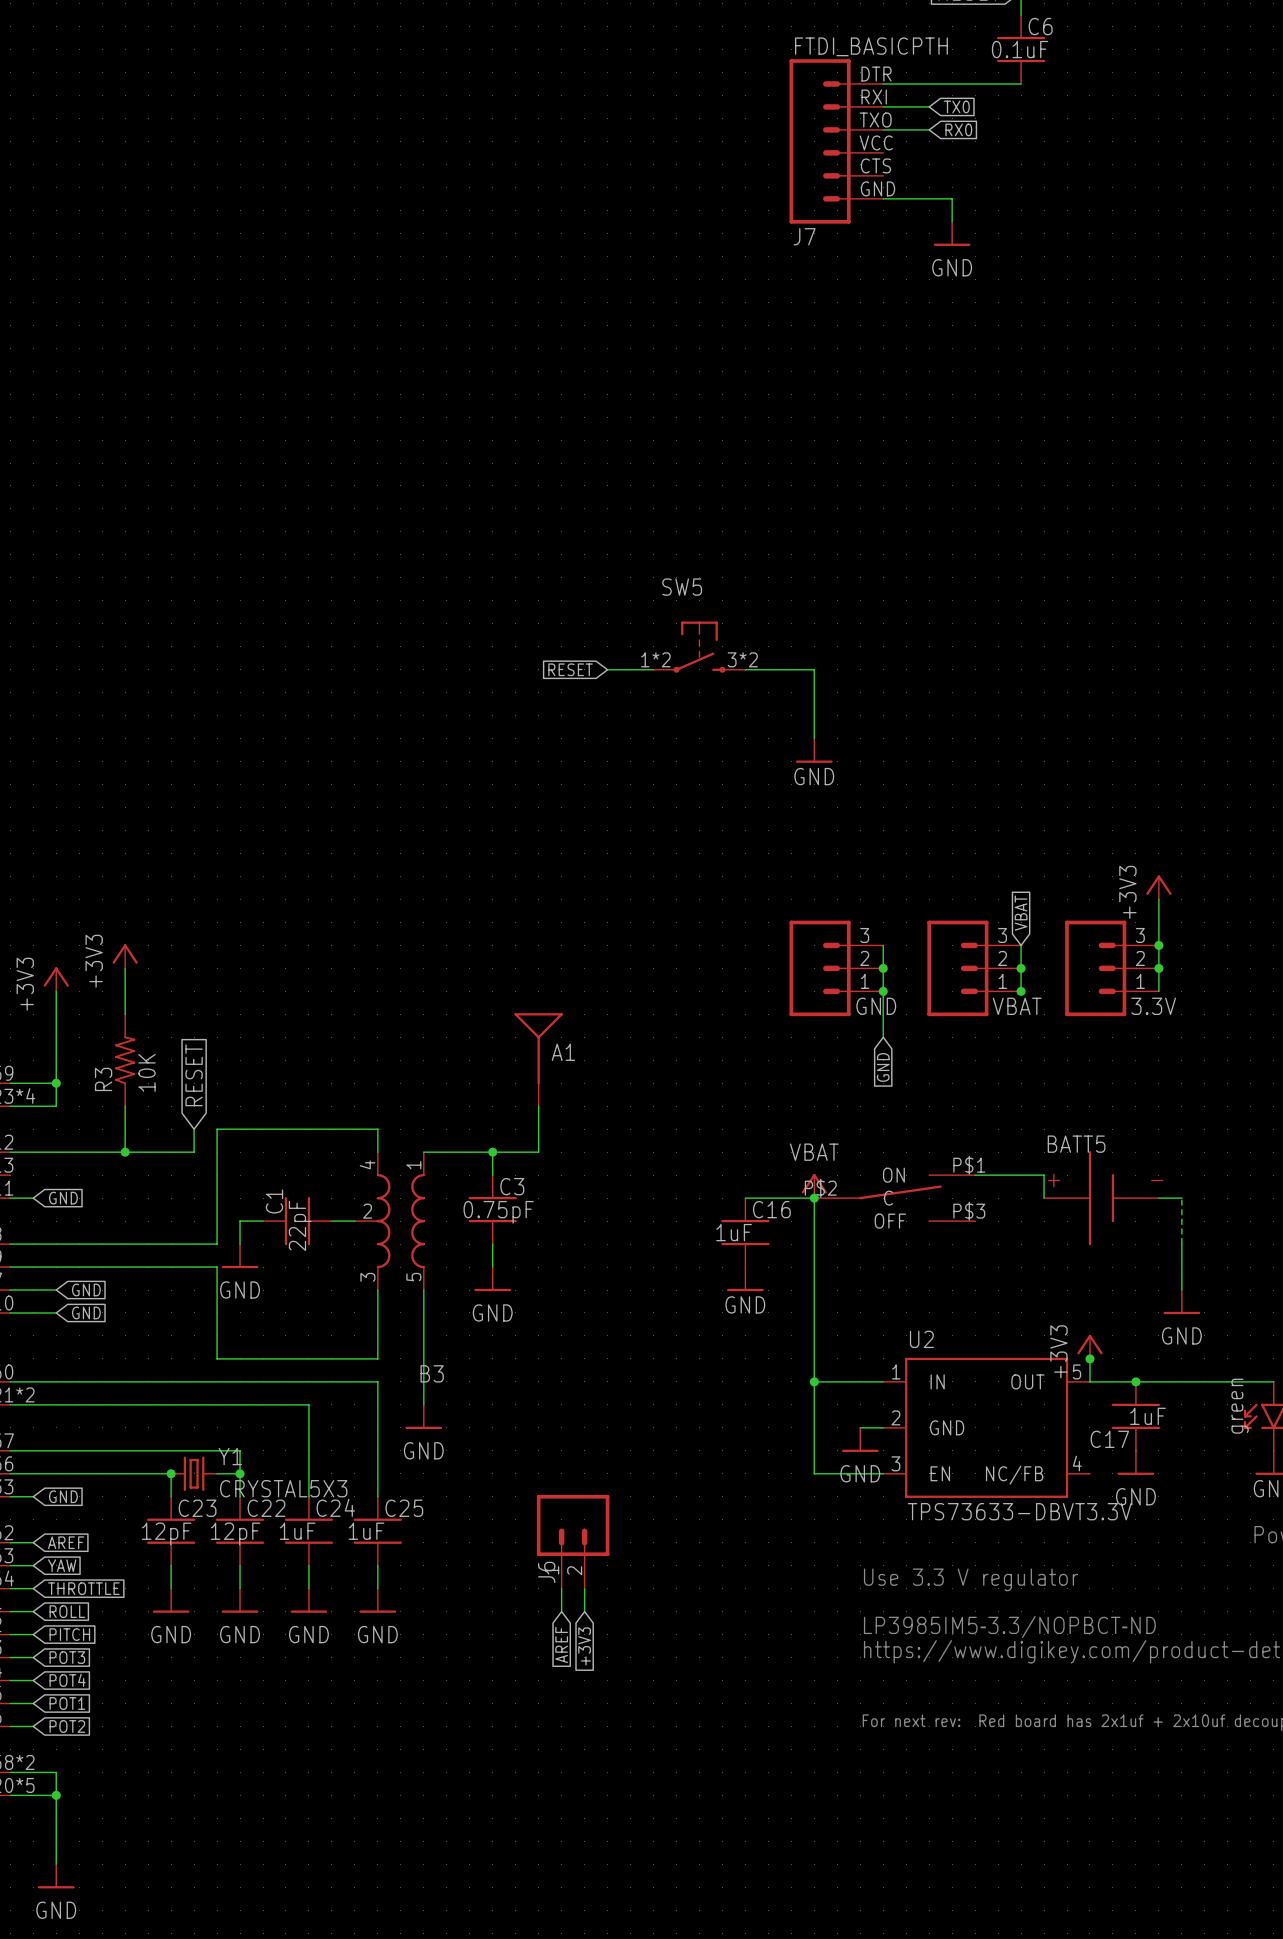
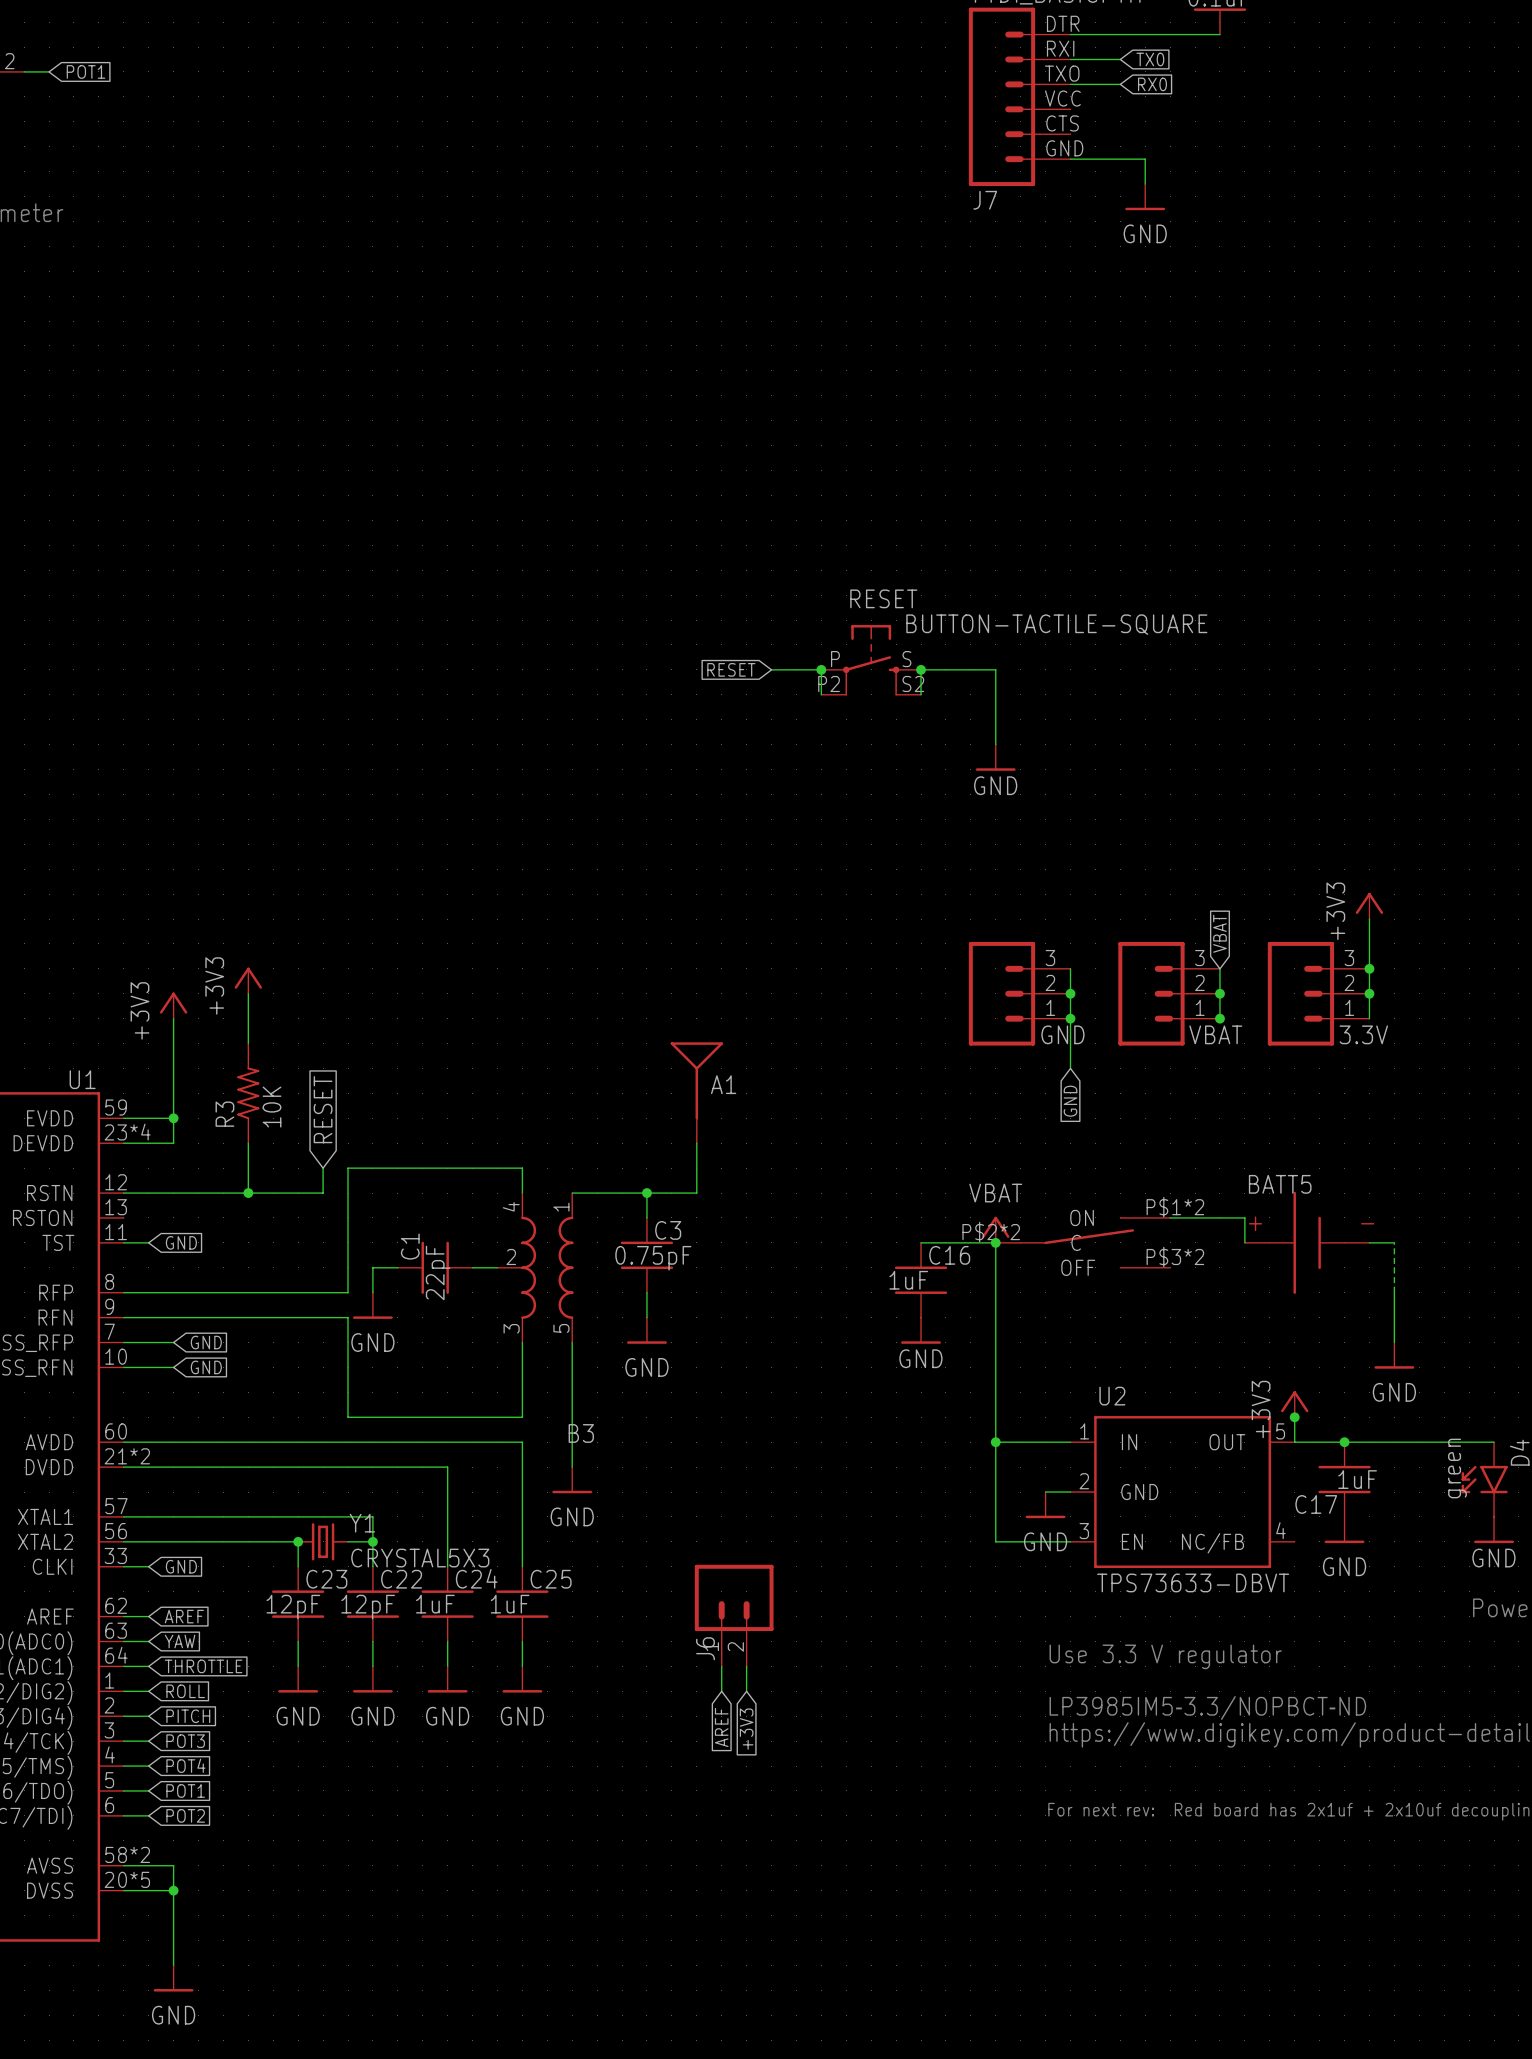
SW5: (699, 647) -> none
RESET: none -> BUTTON-TACTILE-SQUARE (871, 660)
wire: none -> (821, 669) (821, 694)
junction: none -> (821, 669)
wire: none -> (921, 669) (921, 694)
junction: none -> (921, 669)
part pin number: P$1 (969, 1165) -> P$1*2 (1175, 1207)
part pin number: P$2 (820, 1188) -> P$2*2 (991, 1232)
part pin number: P$3 (969, 1211) -> P$3*2 (1175, 1257)
U2 value: TPS73633-DBVT3.3V (1019, 1511) -> TPS73633-DBVT (1193, 1582)

